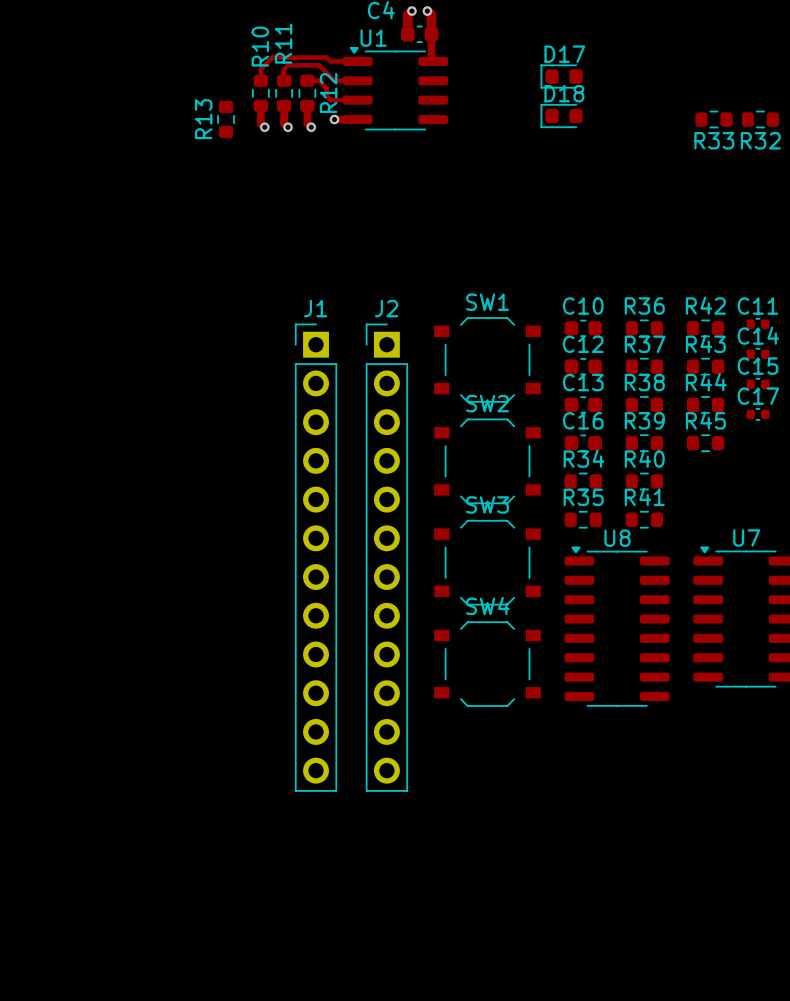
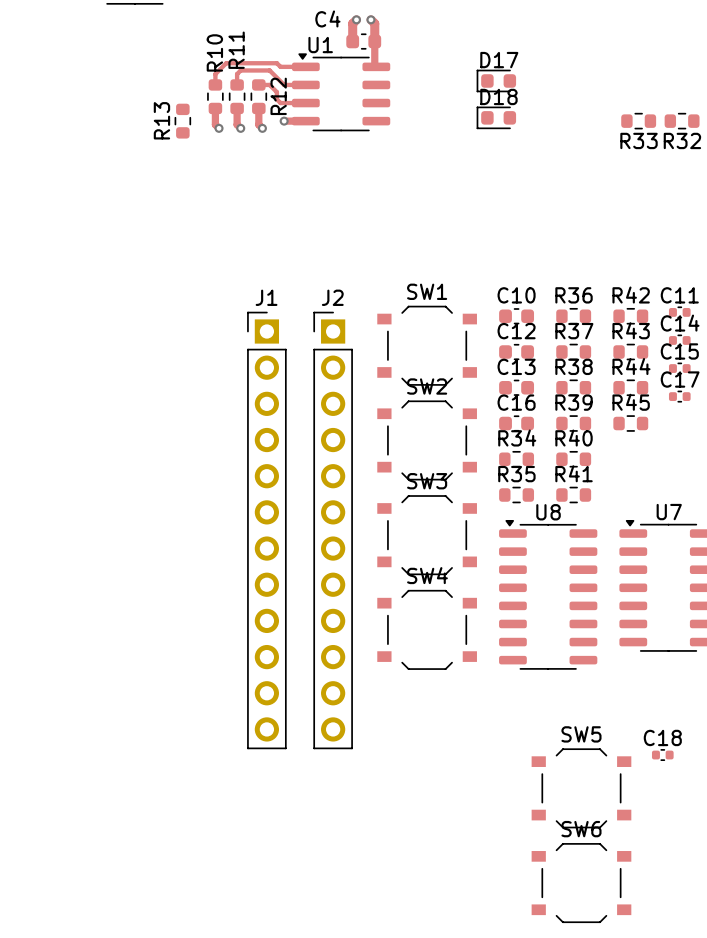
C18: none -> (662, 755)
SW5: none -> (581, 788)
SW6: none -> (581, 883)

